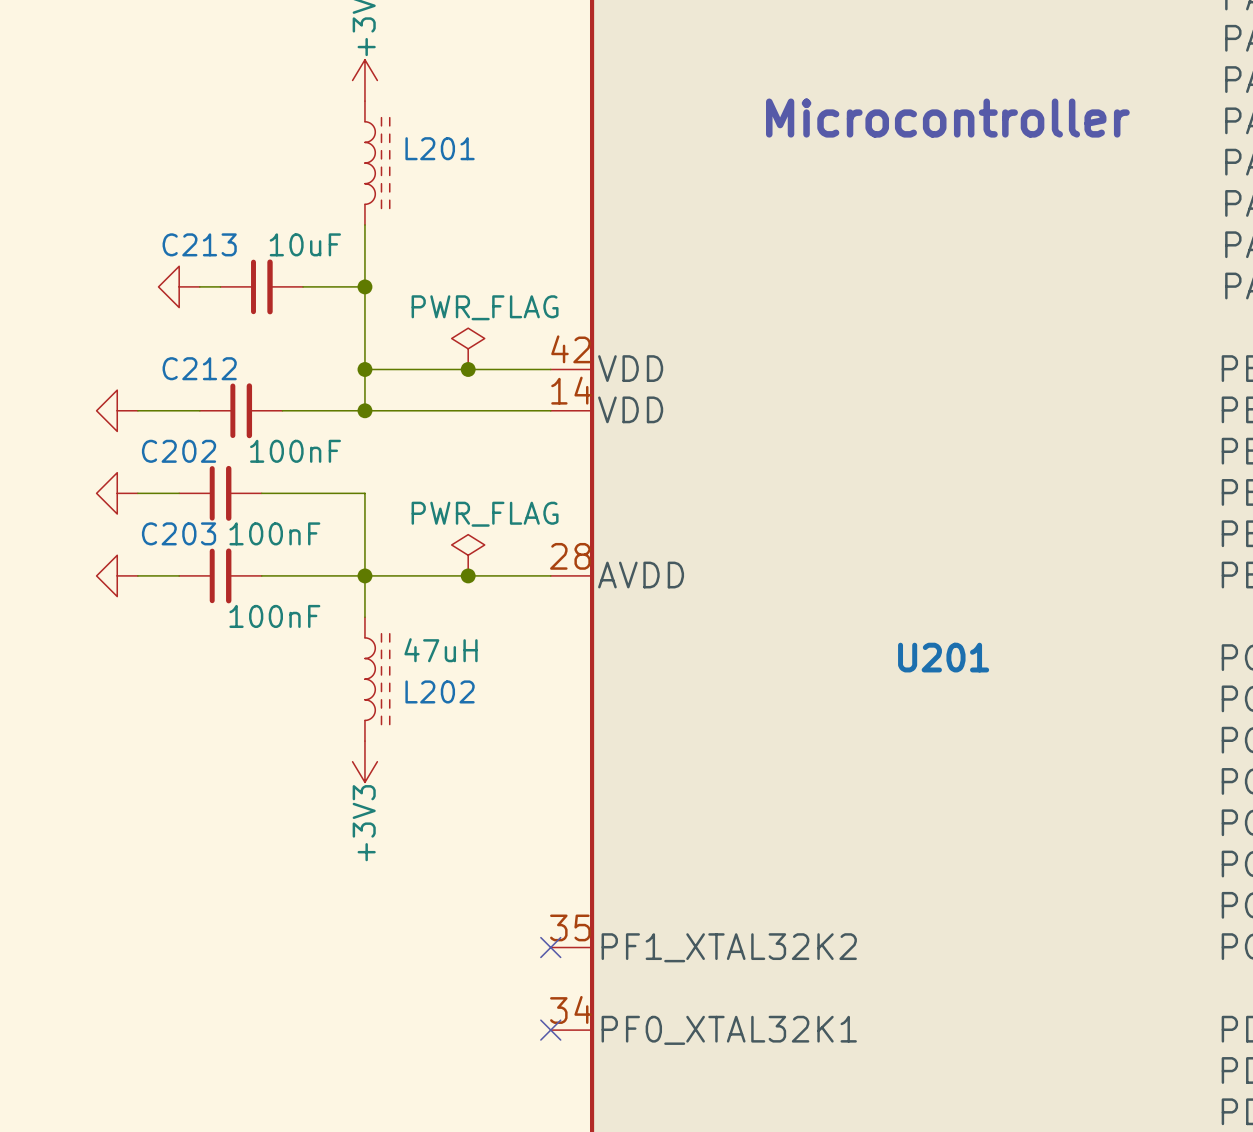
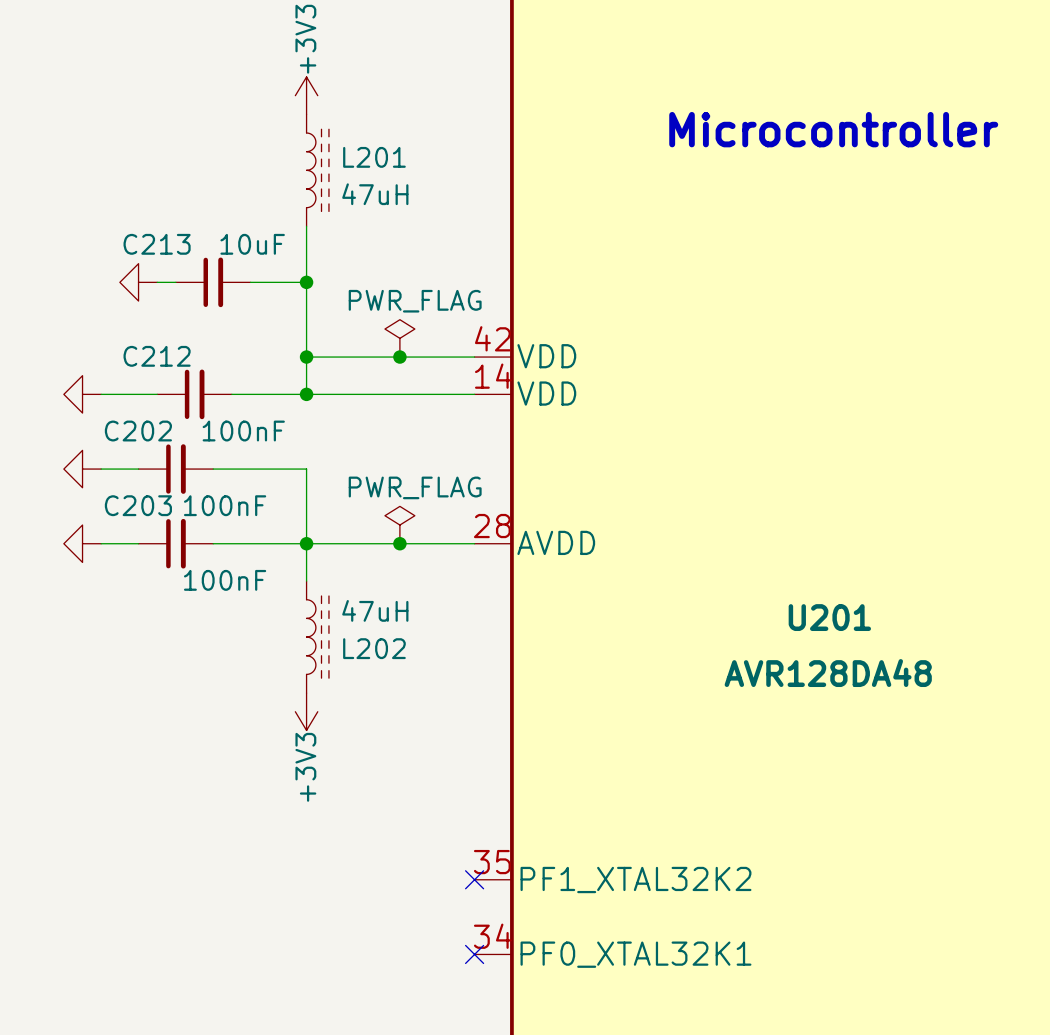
L201 value: none -> 47uH (375, 194)
U201 value: none -> AVR128DA48 (828, 673)

